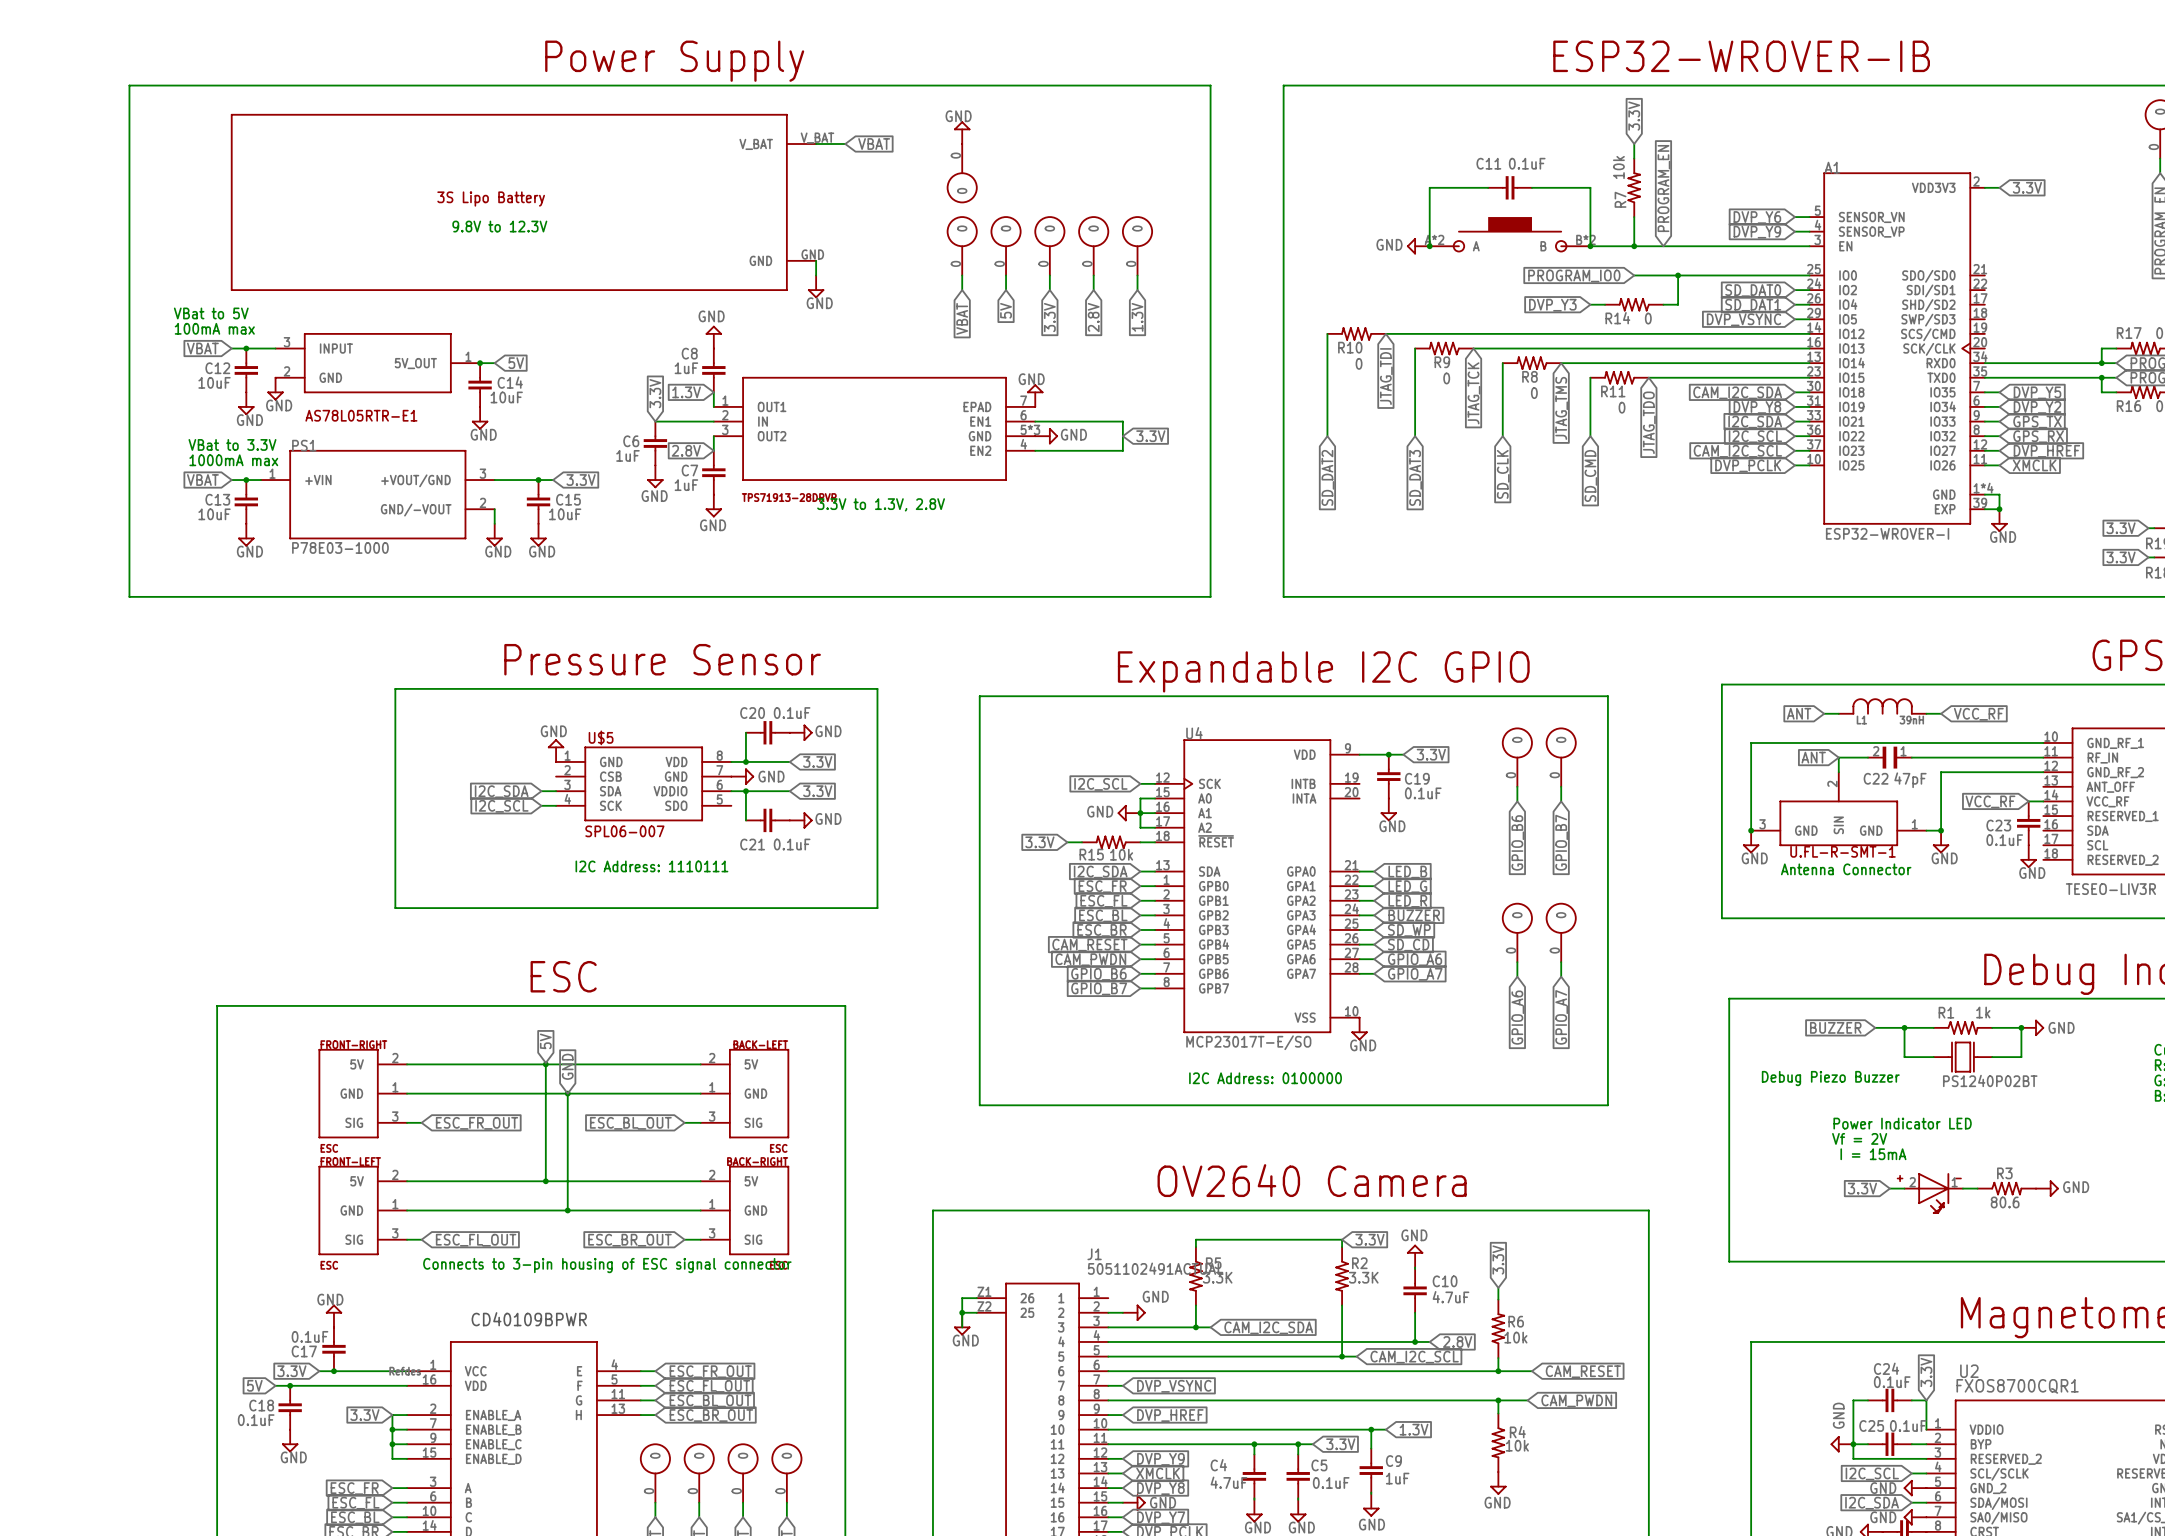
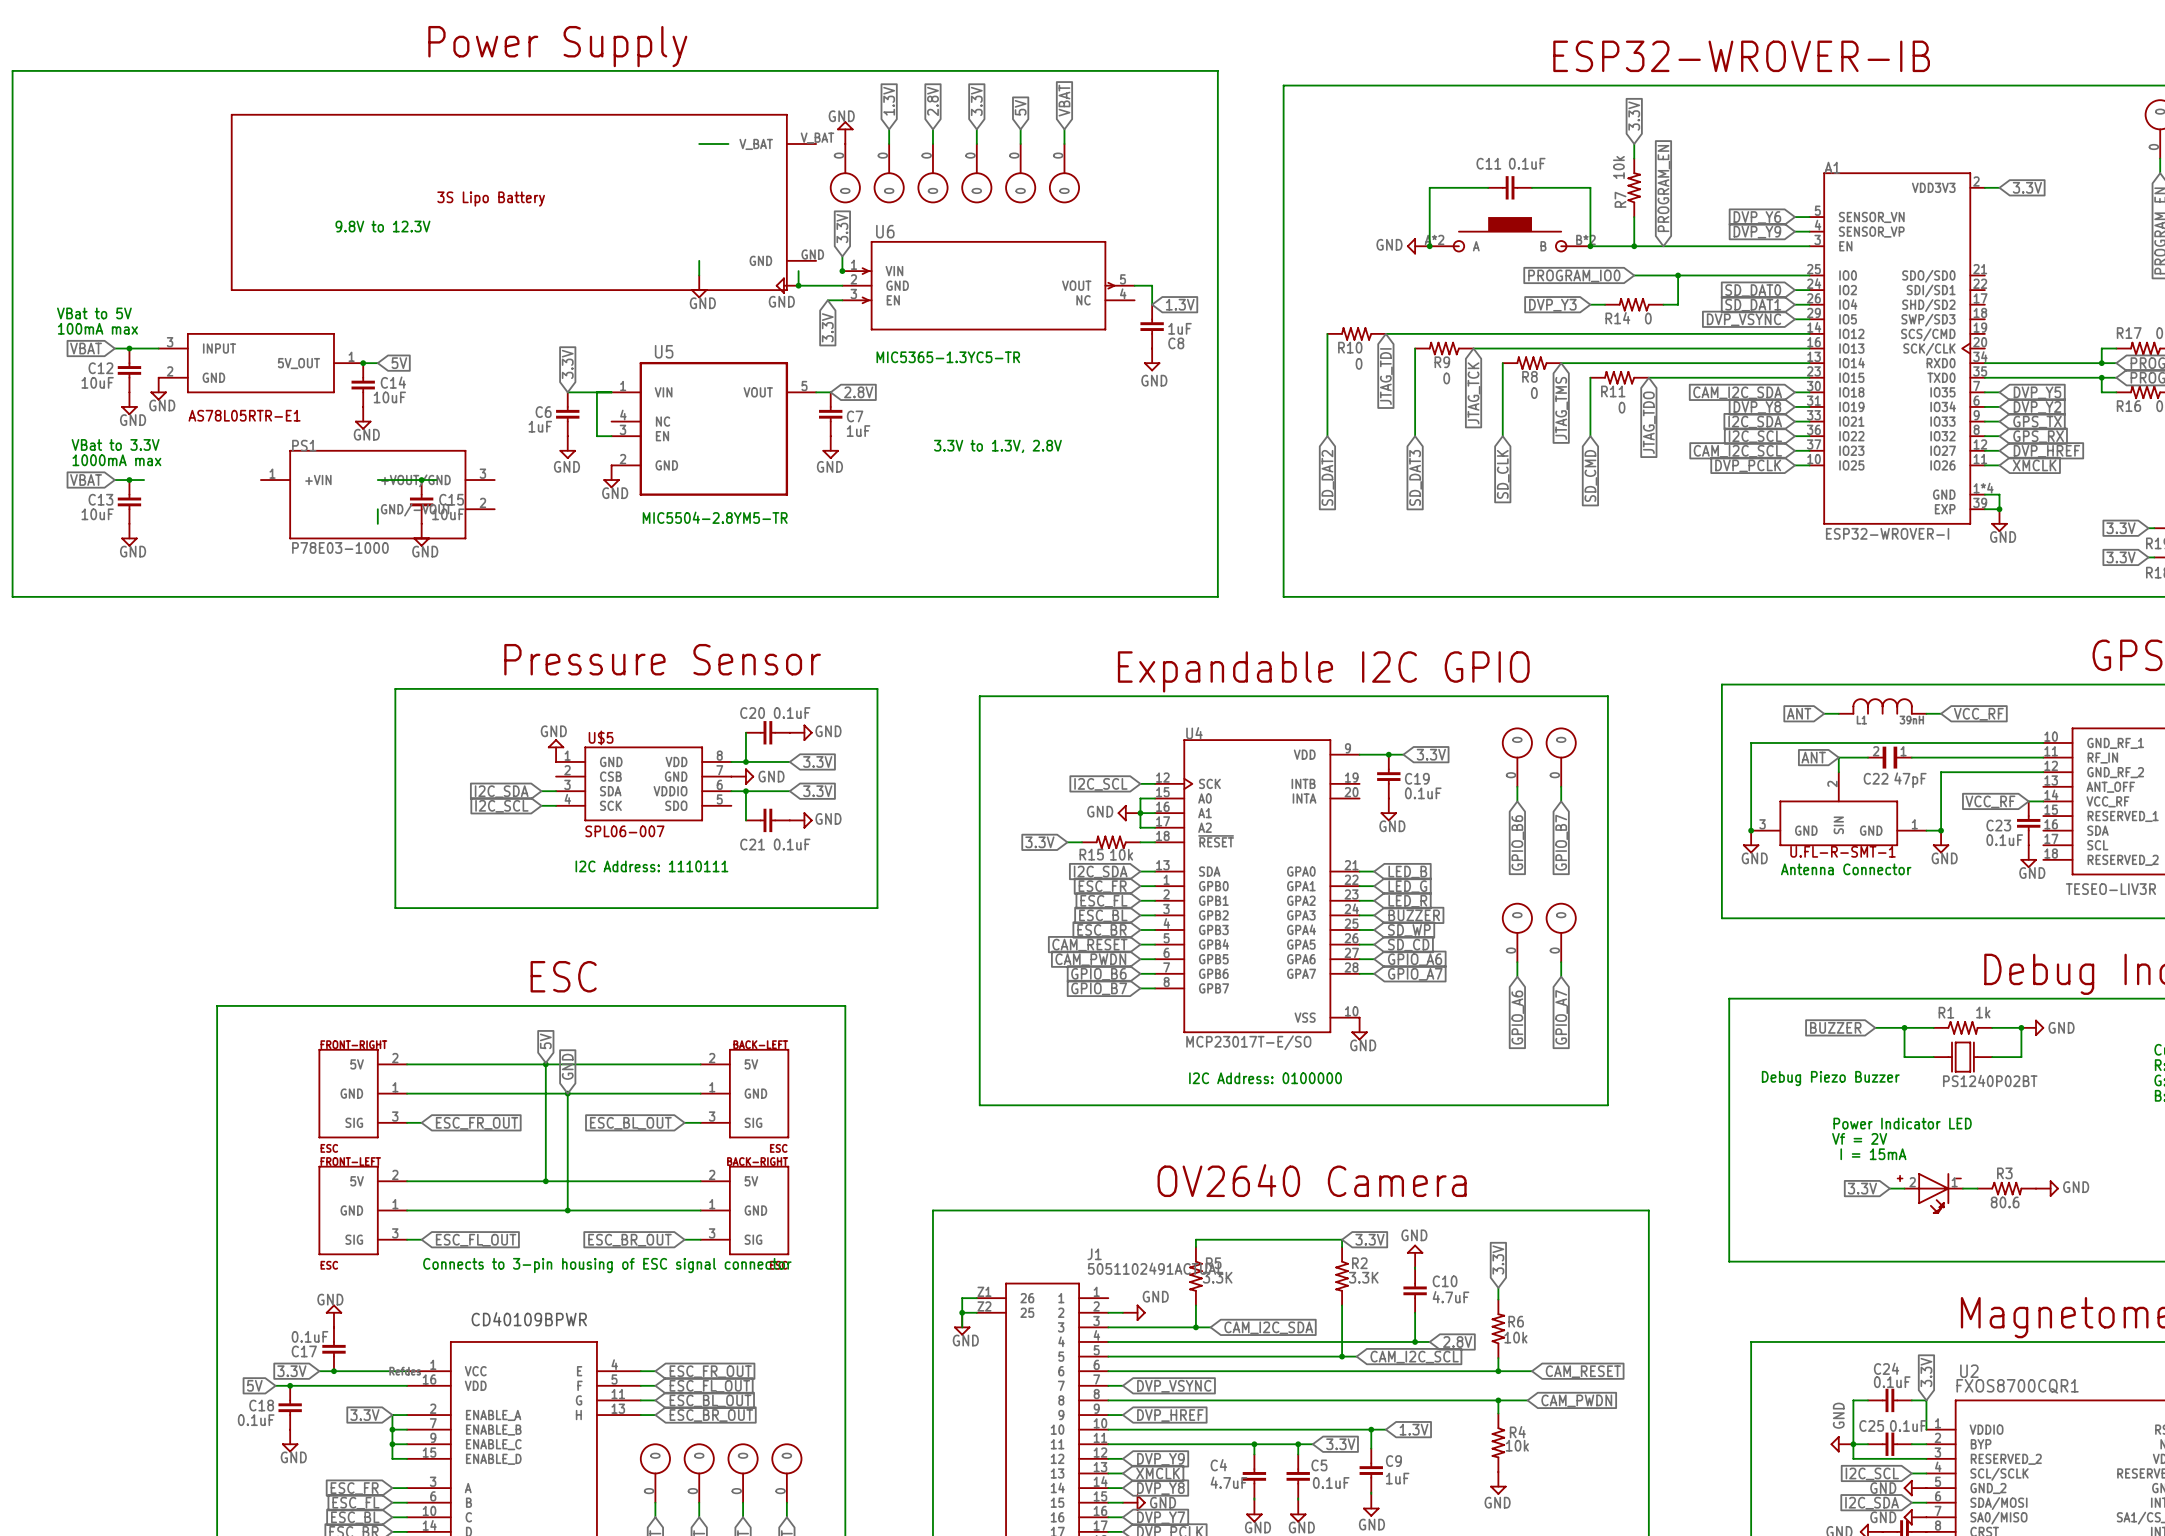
text position: Power Supply (674, 61) -> Power Supply (557, 46)
global label: none -> VBAT (1064, 100)
global label: none -> 1.3V (889, 101)
global label: none -> 2.8V (932, 101)
global label: none -> 3.3V (976, 101)
global label: none -> 5V (1020, 107)
wire: none -> (889, 129) (889, 143)
wire: none -> (932, 129) (932, 143)
wire: none -> (976, 129) (976, 143)
wire: none -> (1020, 129) (1020, 143)
wire: none -> (1064, 129) (1064, 143)
power symbol: none -> GND (845, 132)
power symbol: GND (962, 132) -> none
wire: (816, 143) (845, 143) -> (699, 143) (728, 143)
global label: VBAT (874, 143) -> none
part: none -> (845, 173)
part: none -> (889, 173)
part: none -> (932, 173)
part: (962, 173) -> none
part: none -> (976, 173)
part: none -> (1020, 173)
part: none -> (1064, 173)
text position: 9.8V to 12.3V (499, 226) -> 9.8V to 12.3V (382, 226)
global label: none -> 3.3V (842, 228)
part: (962, 245) -> none
part: (1006, 245) -> none
part: (1049, 245) -> none
part: (1093, 245) -> none
part: (1137, 245) -> none
wire: (816, 260) (816, 275) -> (699, 260) (699, 275)
wire: none -> (798, 271) (798, 285) (842, 285)
junction: none -> (842, 271)
wire: (962, 275) (962, 290) -> (842, 256) (842, 271)
wire: (1006, 275) (1006, 290) -> none
wire: (1049, 275) (1049, 290) -> none
wire: (1093, 275) (1093, 290) -> none
wire: (1137, 275) (1137, 290) -> none
junction: none -> (798, 285)
U6: none -> (988, 285)
wire: none -> (1134, 285) (1152, 285) (1152, 304)
power symbol: none -> GND (699, 286)
power symbol position: GND (816, 286) -> GND (787, 285)
power symbol rotation: 0° (816, 293) -> 90° clockwise (780, 285)
wire: none -> (827, 300) (842, 300)
power symbol text position: GND (819, 303) -> GND (781, 301)
global label: 5V (1006, 310) -> none
text position: VBat to 5V (211, 313) -> VBat to 5V (94, 313)
global label: 3.3V (1049, 317) -> none
global label: 2.8V (1093, 317) -> none
global label rotation: 0° (1137, 317) -> 90° counterclockwise (1180, 304)
global label: VBAT (962, 318) -> none
global label: none -> 3.3V (827, 327)
text position: 100mA max (214, 328) -> 100mA max (97, 328)
power symbol: GND (713, 337) -> none
global label: none -> VBAT (86, 348)
junction: none -> (129, 348)
global label: VBAT (202, 348) -> none
wire: (231, 348) (275, 348) -> (114, 348) (158, 348)
junction: (246, 348) -> none
C8 name position: C8 (689, 353) -> C8 (1176, 343)
text: none -> MIC5365-1.3YC5-TR (948, 357)
power symbol: none -> GND (1152, 359)
junction: none -> (363, 363)
part position: (377, 363) -> (260, 363)
wire: (480, 363) (494, 363) -> (363, 363) (377, 363)
junction: (480, 363) -> none
global label position: 5V (516, 363) -> 5V (399, 363)
global label: none -> 3.3V (567, 364)
C8 value position: 1uF (686, 368) -> 1uF (1179, 328)
C12 position: (246, 370) -> (129, 370)
C8 position: (713, 370) -> (1152, 326)
C14 position: (480, 385) -> (363, 385)
power symbol: none -> GND (158, 389)
power symbol: GND (275, 389) -> none
wire: none -> (567, 392) (611, 392)
wire: none -> (596, 392) (596, 436) (611, 436)
global label: 1.3V (686, 392) -> none
wire: (713, 392) (713, 406) -> none
wire: none -> (816, 392) (830, 392)
global label: 3.3V (655, 393) -> none
power symbol: GND (1035, 395) -> none
power symbol: none -> GND (129, 403)
power symbol: GND (246, 403) -> none
power symbol: none -> GND (363, 418)
power symbol: GND (480, 418) -> none
wire: (655, 421) (713, 421) -> none
wire: (1035, 421) (1122, 421) (1122, 450) (1035, 450) -> none
U5: none -> (713, 428)
part: (874, 428) -> none
wire: (713, 436) (713, 450) -> none
power symbol: GND (1046, 436) -> none
global label: 3.3V (1150, 436) -> none
C6 position: (655, 443) -> (567, 414)
text position: VBat to 3.3V (232, 444) -> VBat to 3.3V (115, 444)
power symbol: none -> GND (567, 447)
power symbol: none -> GND (830, 447)
global label rotation: 0° (686, 450) -> 180° (858, 392)
global label position: 2.8V (686, 450) -> 2.8V (858, 392)
text position: 1000mA max (233, 460) -> 1000mA max (116, 460)
C7 name position: C7 (689, 470) -> C7 (855, 416)
C7 position: (713, 472) -> (830, 414)
power symbol position: GND (655, 476) -> GND (611, 476)
global label: none -> VBAT (86, 480)
junction: none -> (129, 480)
global label: VBAT (202, 480) -> none
wire: (231, 480) (260, 480) -> (114, 480) (144, 480)
junction: (246, 480) -> none
junction: none -> (421, 480)
wire: (494, 480) (553, 480) -> (377, 480) (436, 480)
junction: (538, 480) -> none
global label: 3.3V (581, 480) -> none
C7 value position: 1uF (686, 485) -> 1uF (858, 431)
power symbol text position: GND (654, 496) -> GND (615, 493)
C13 position: (246, 501) -> (129, 501)
C15 position: (538, 501) -> (421, 501)
text position: 3.3V to 1.3V, 2.8V (881, 504) -> 3.3V to 1.3V, 2.8V (997, 446)
power symbol: GND (713, 505) -> none
wire: (494, 509) (494, 523) -> (377, 509) (377, 523)
text: none -> MIC5504-2.8YM5-TR (715, 517)
power symbol: none -> GND (129, 535)
power symbol: GND (246, 535) -> none
power symbol: none -> GND (421, 535)
power symbol: GND (494, 535) -> none
power symbol: GND (538, 535) -> none
wire: (129, 596) (129, 85) (1210, 85) (1210, 596) -> (129, 596) (12, 596) (12, 70) (1217, 70) (1217, 596) (1210, 596)

